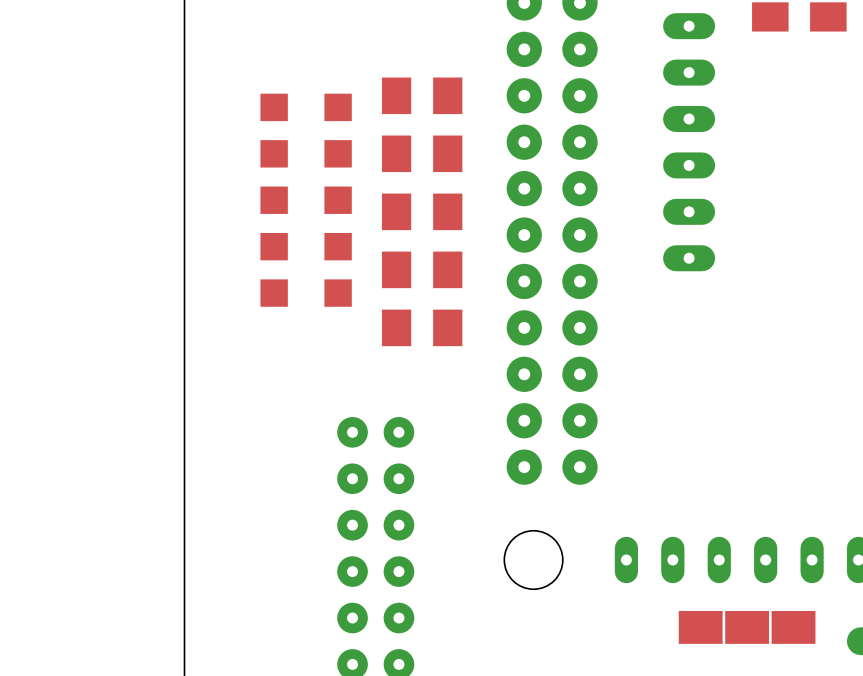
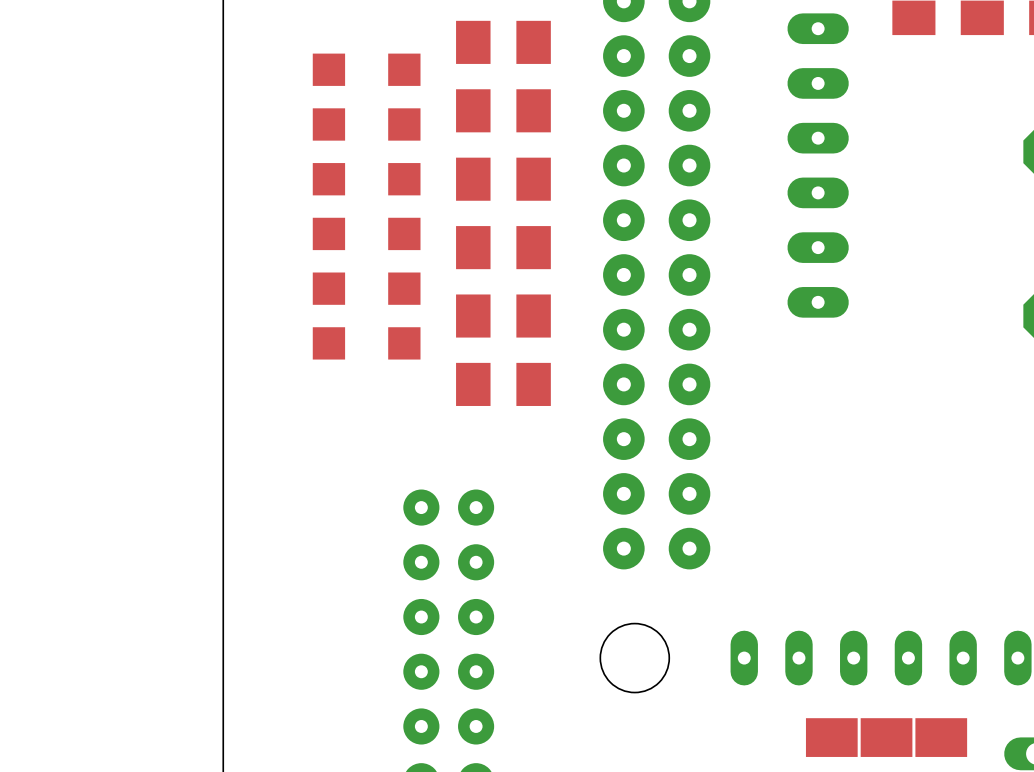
part: none -> (503, 42)
part: none -> (366, 69)

